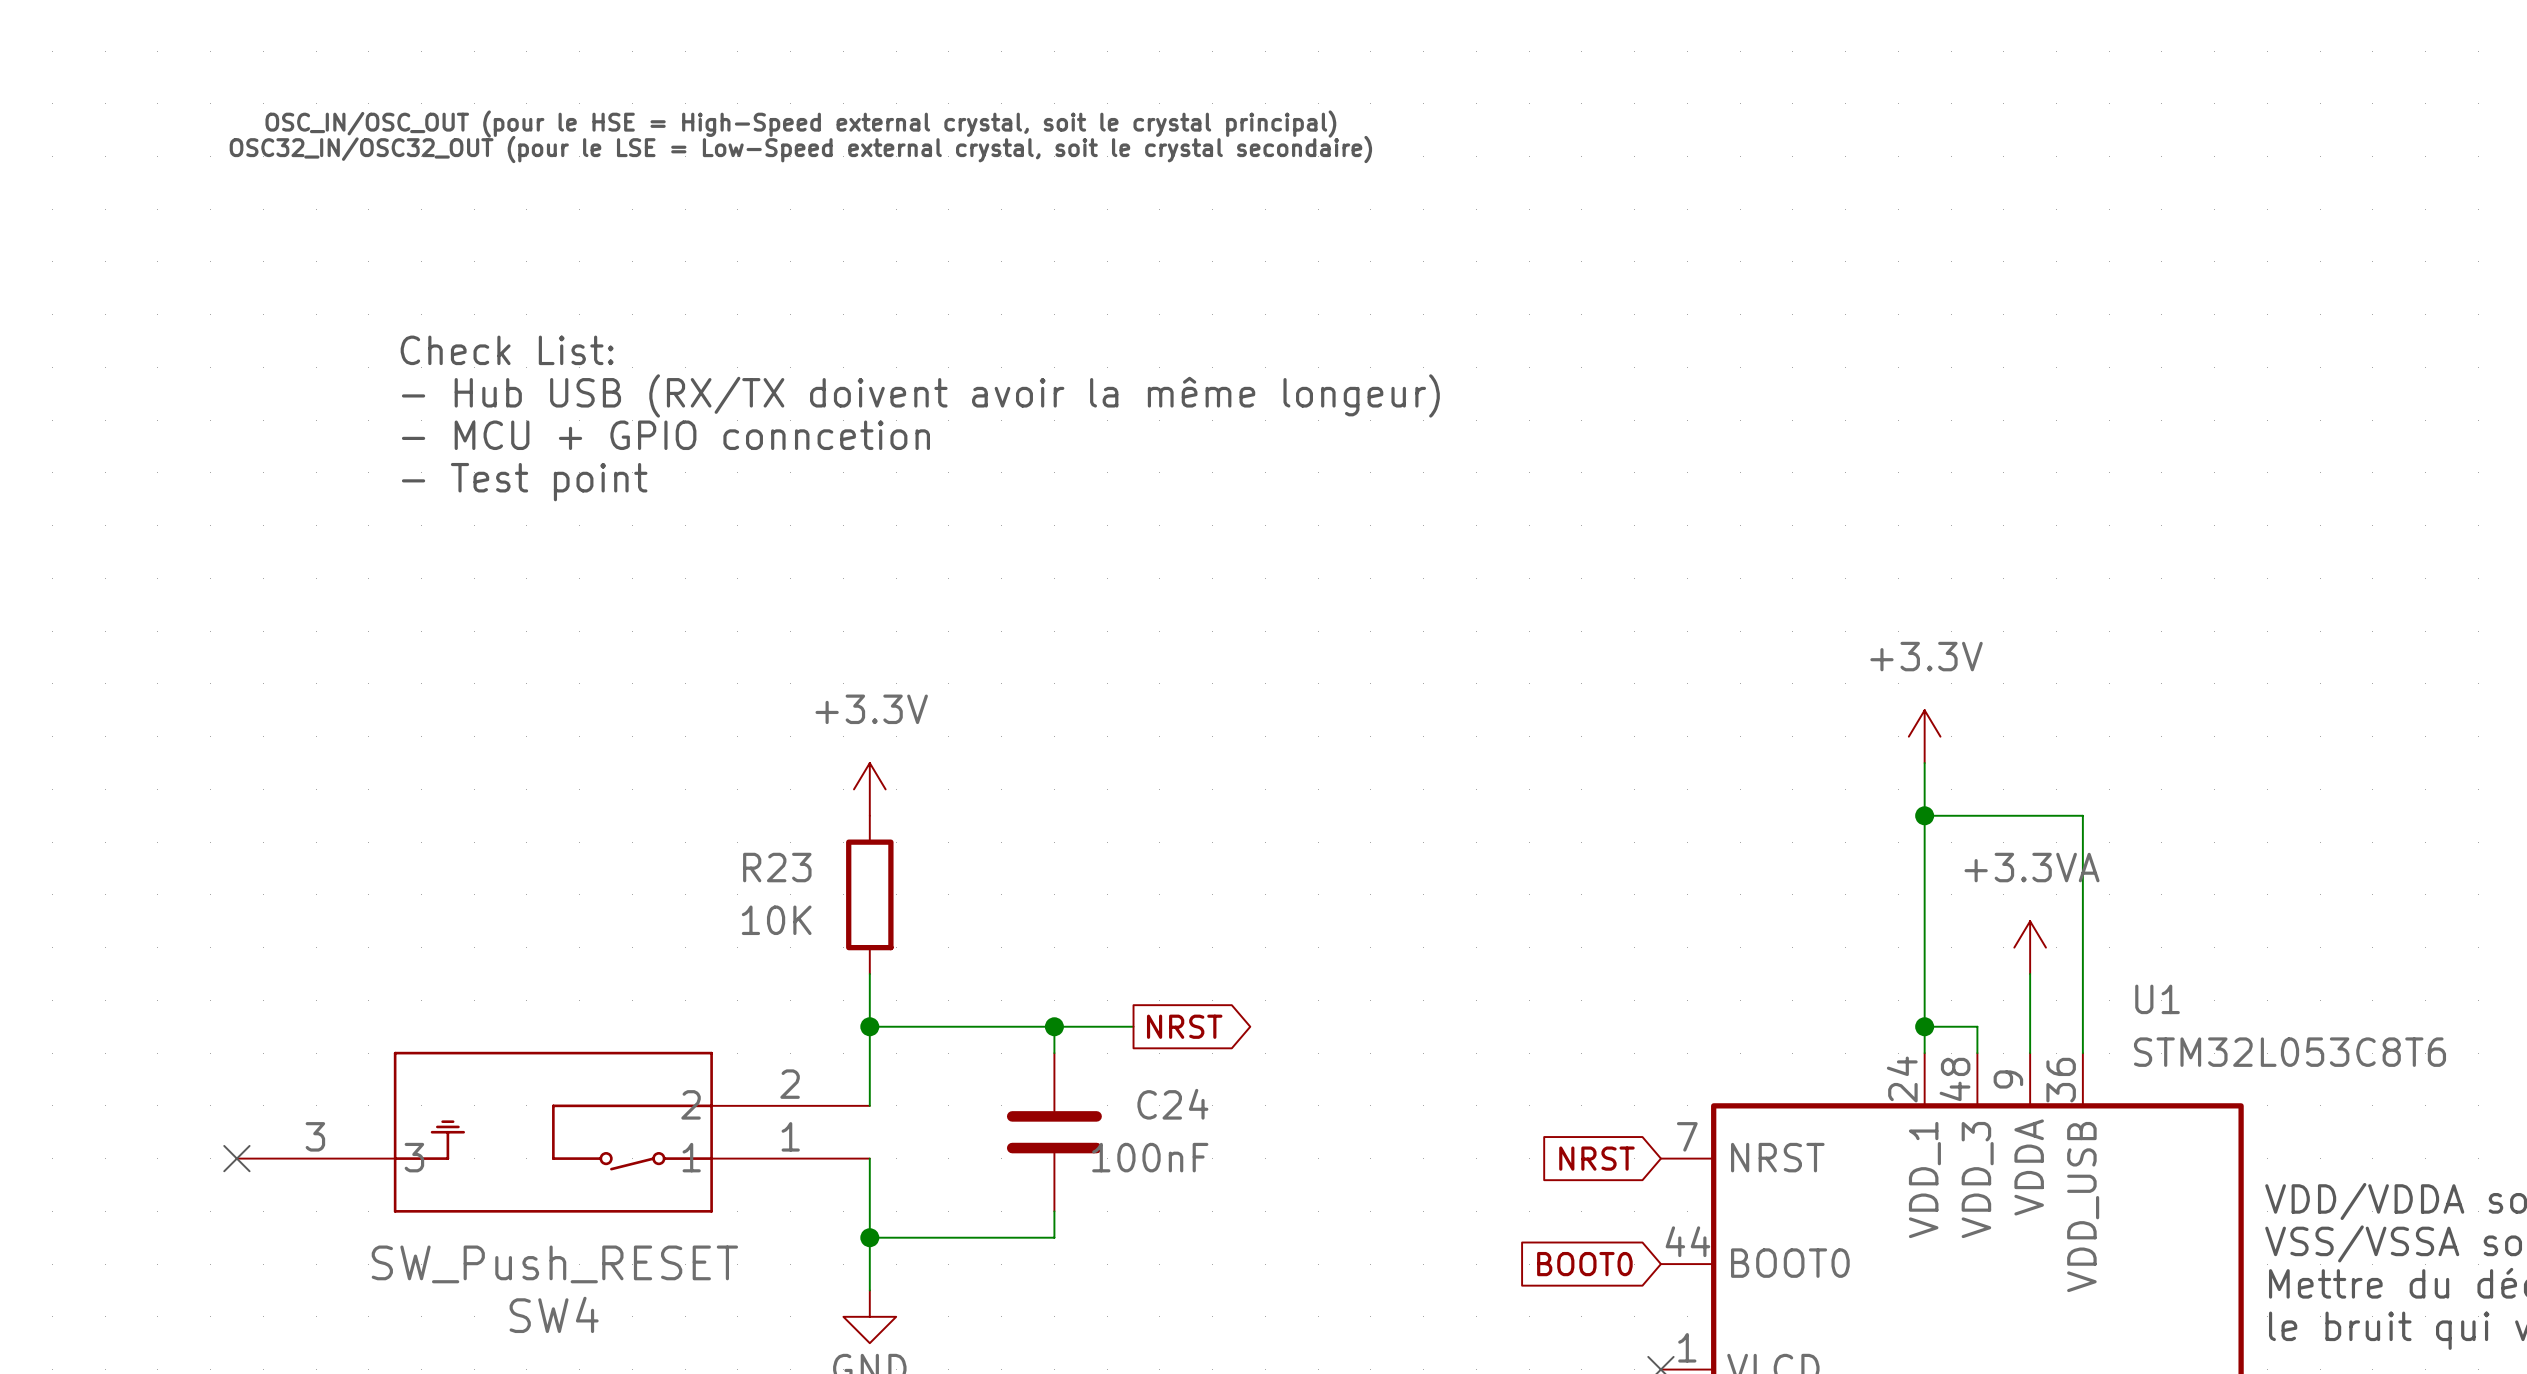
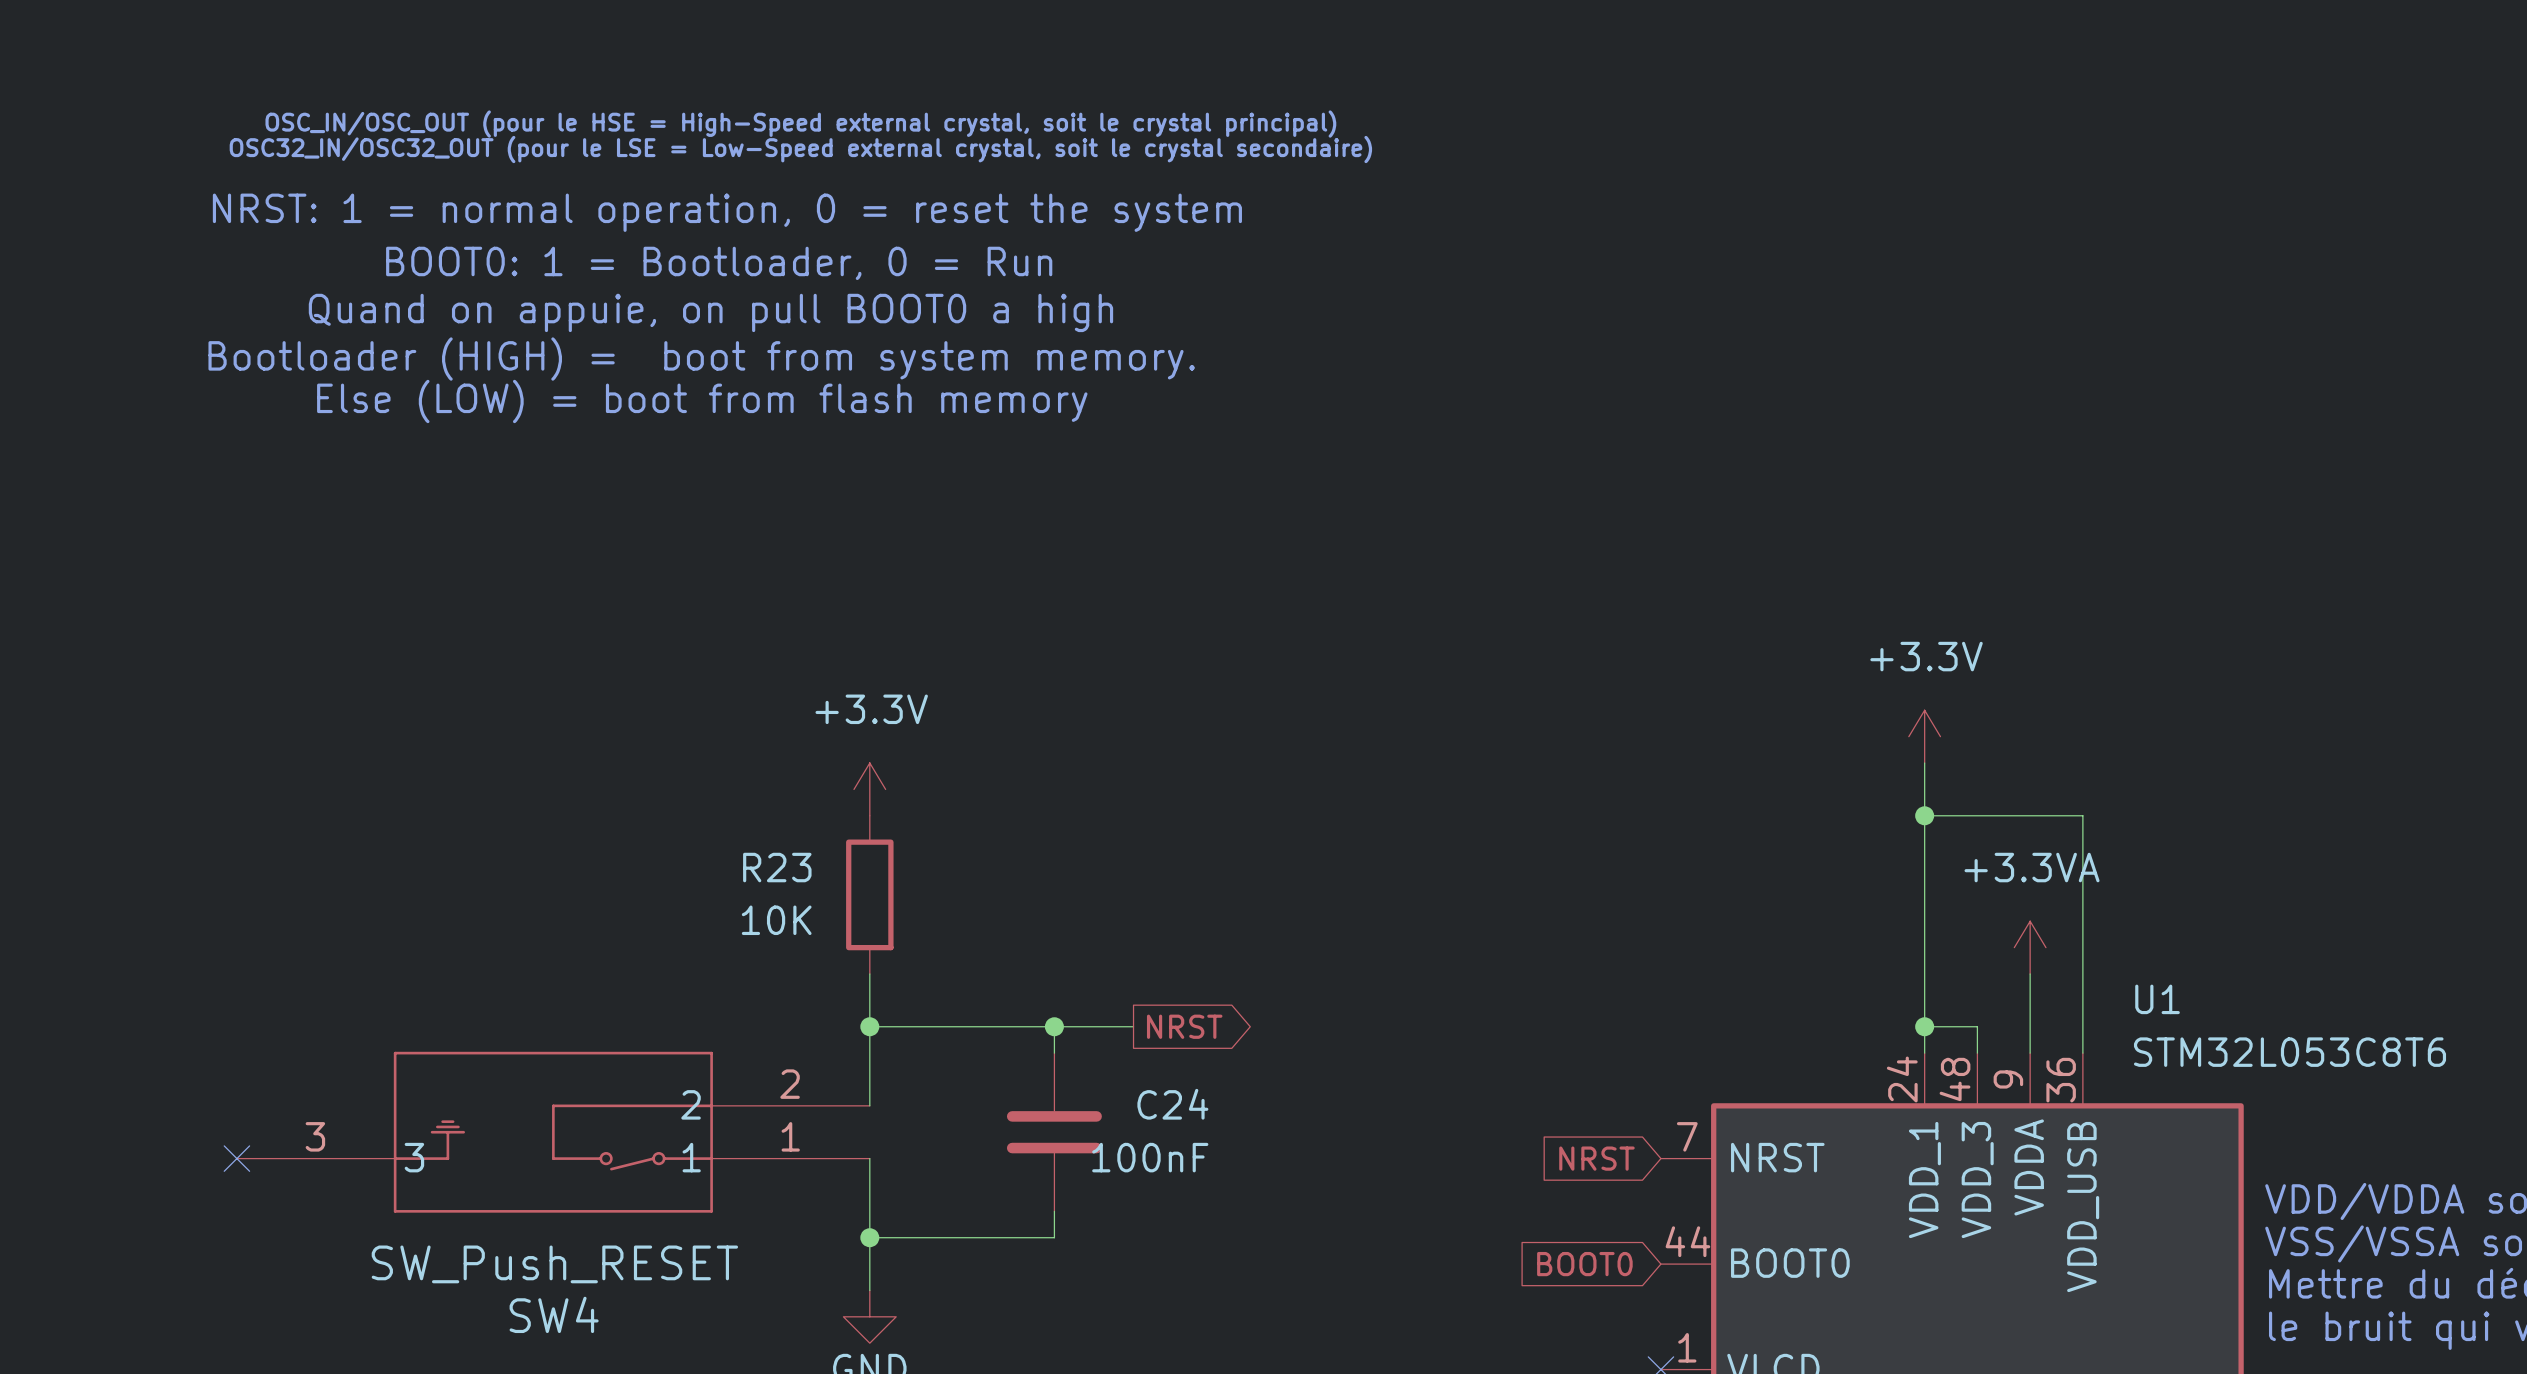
text: none -> NRST: 1 = normal operation, 0 = reset the system (727, 212)
text: none -> BOOT0: 1 = Bootloader, 0 = Run (719, 263)
text: none -> Quand on appuie, on pull BOOT0 a high (710, 312)
text: Check List: (507, 350) -> none
text: none -> Bootloader (HIGH) = boot from system memory. (701, 359)
text: - Hub USB (RX/TX doivent avoir la même longeur) (920, 395) -> none
text: none -> Else (LOW) = boot from flash memory (702, 401)
text: - MCU + GPIO conncetion (665, 435) -> none
text: - Test point (524, 482) -> none

